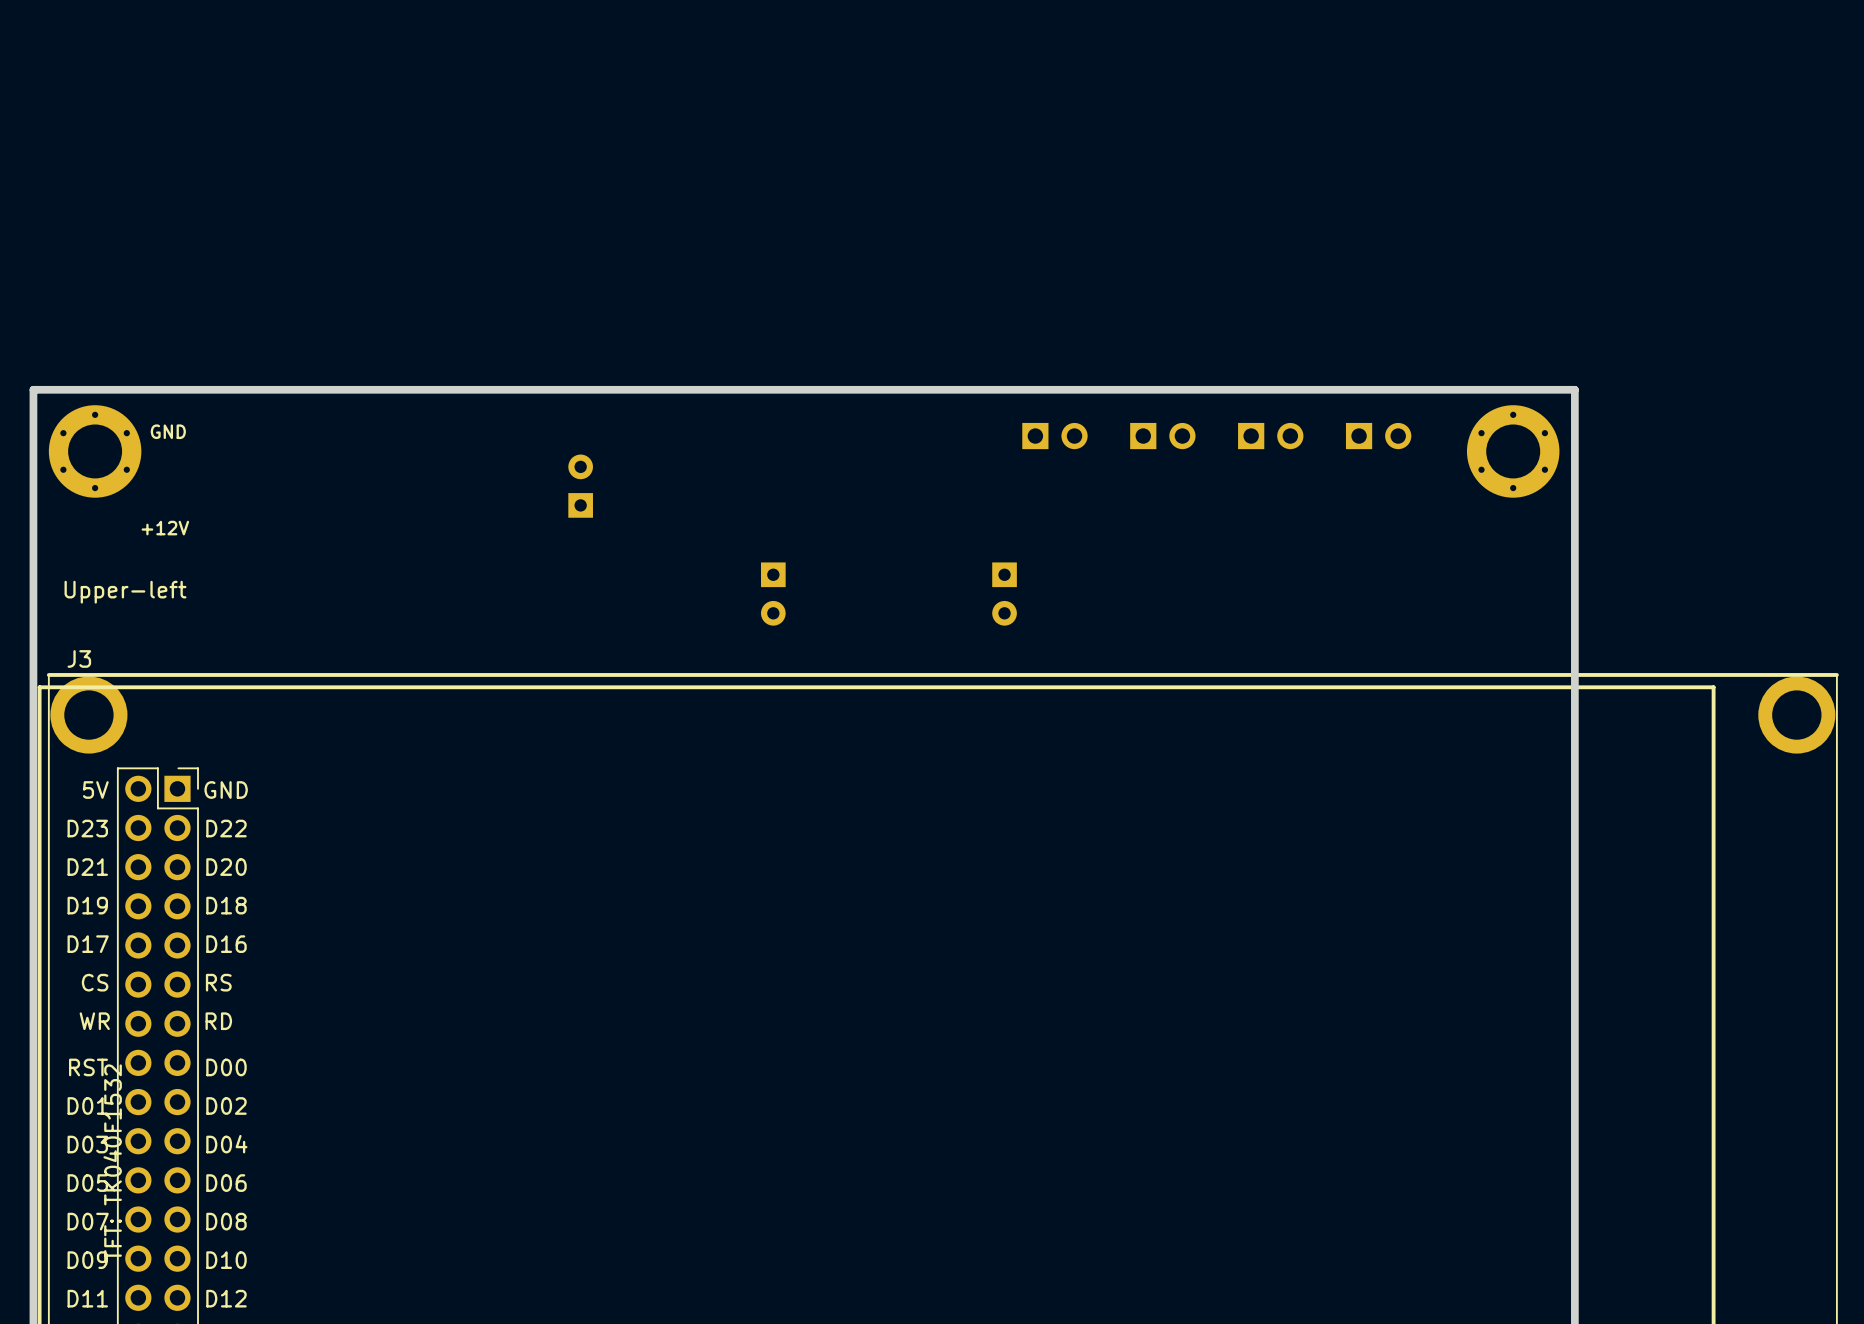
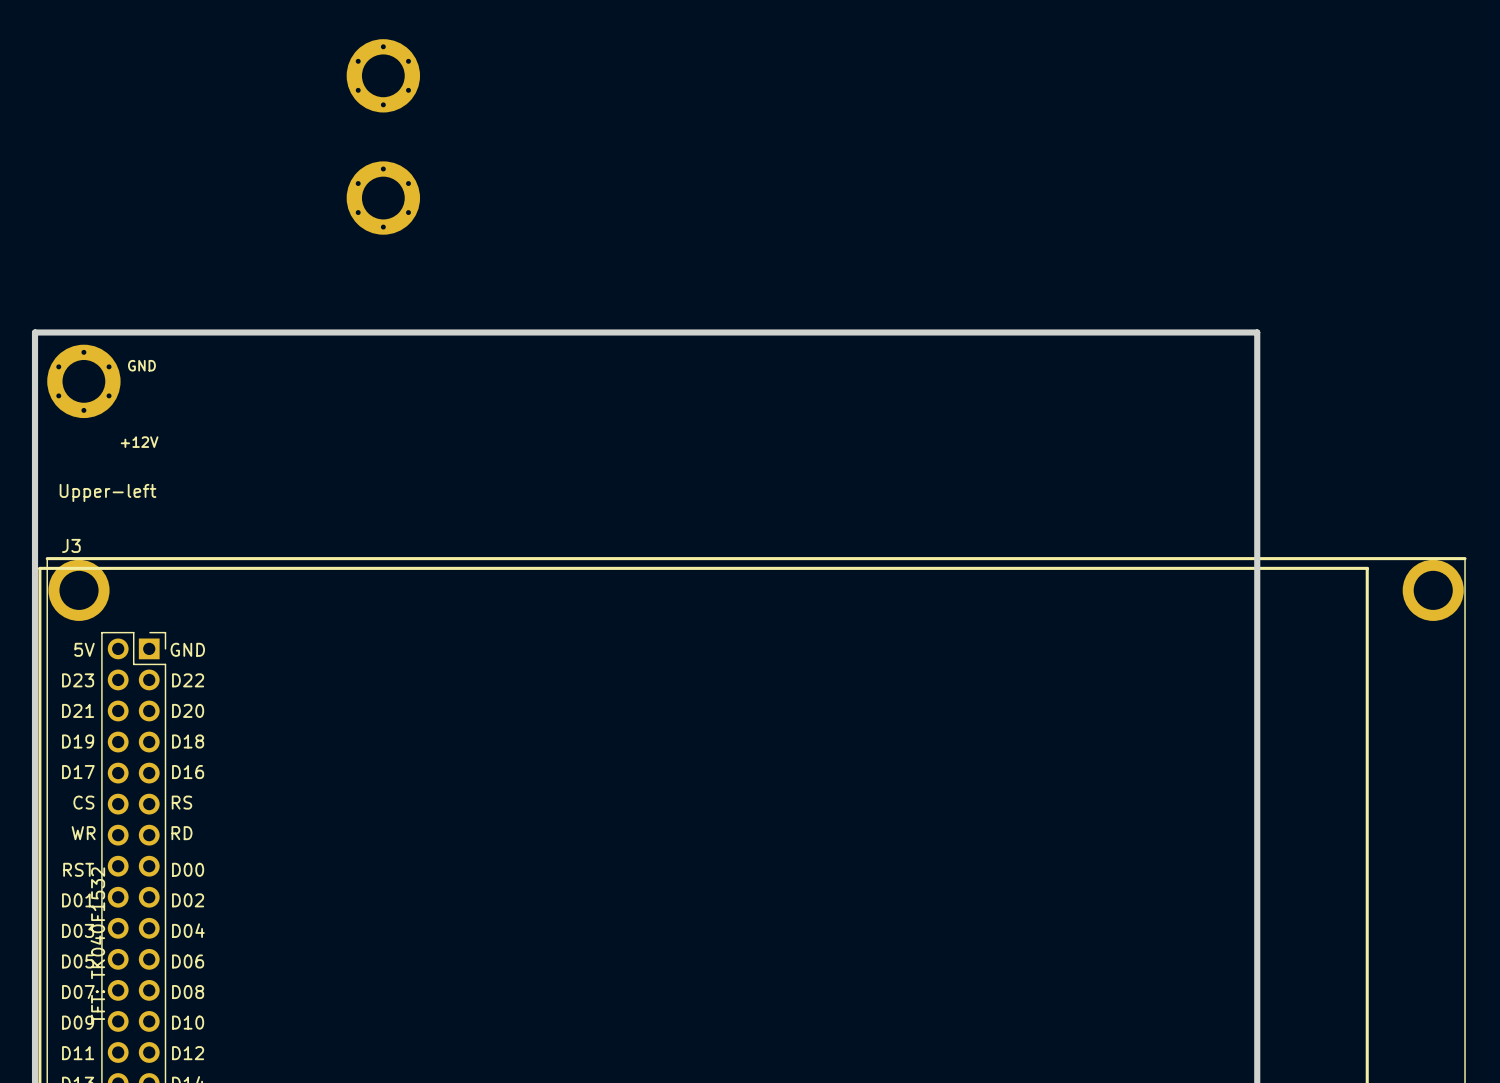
part: none -> (383, 75)
part: none -> (383, 198)
part: (1054, 436) -> none
part: (1162, 436) -> none
part: (1270, 436) -> none
part: (1378, 436) -> none
part: (1513, 451) -> none
part: (580, 486) -> none
part: (773, 594) -> none
part: (1004, 594) -> none

